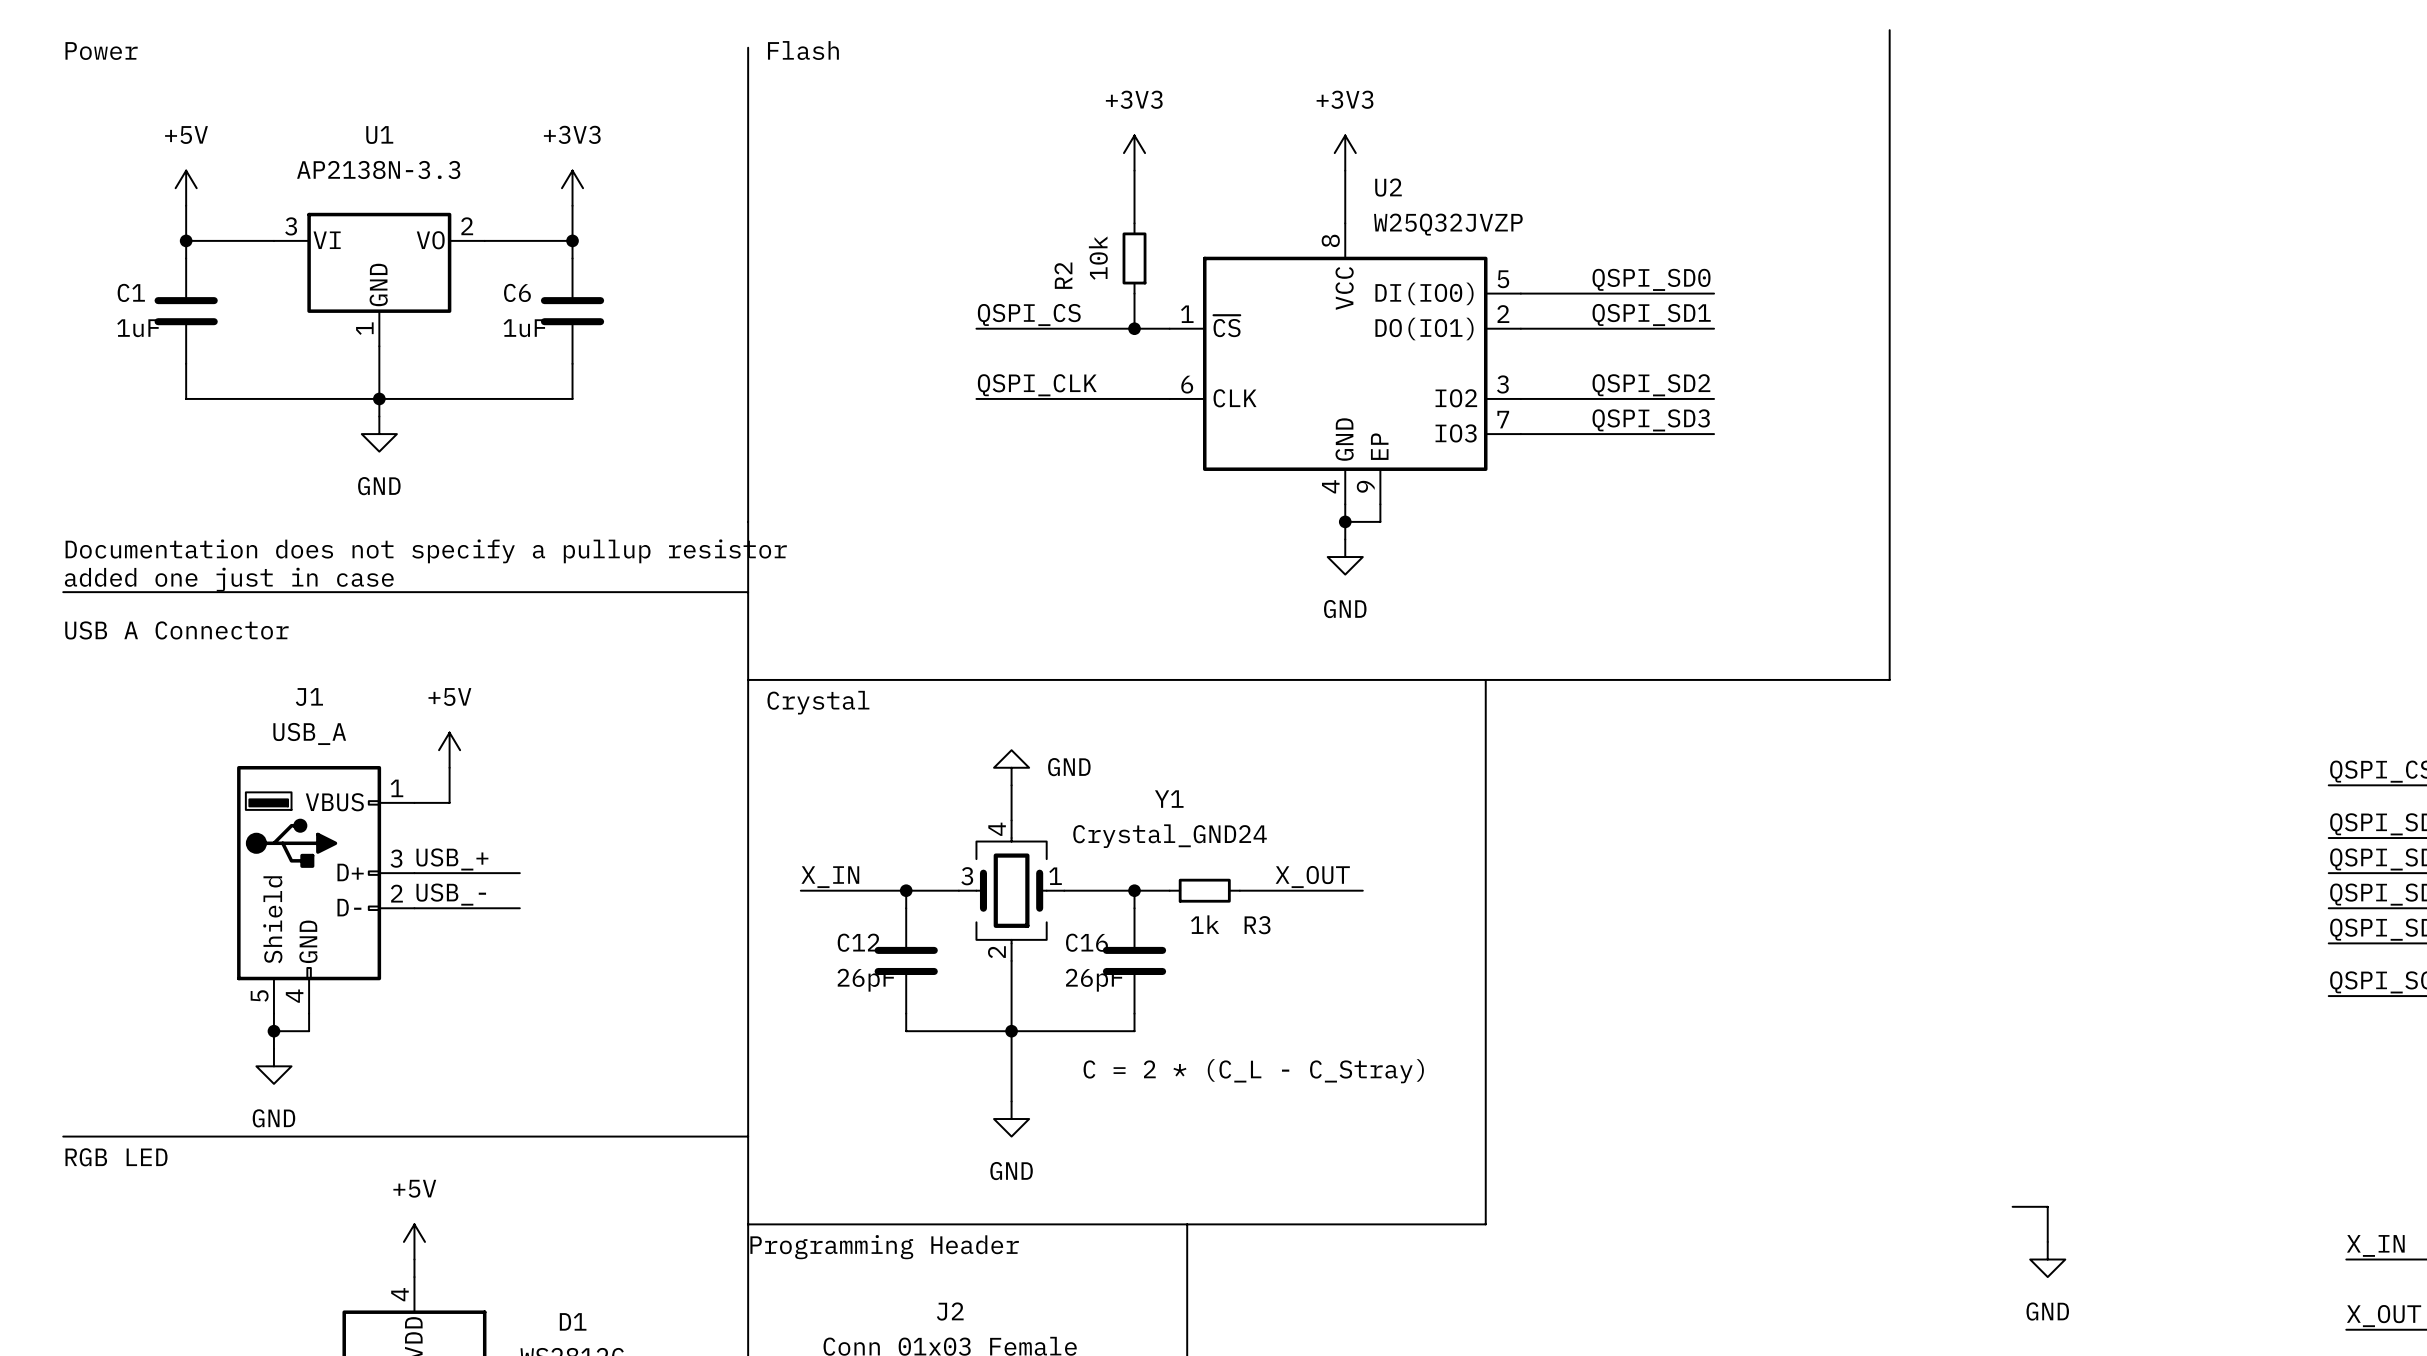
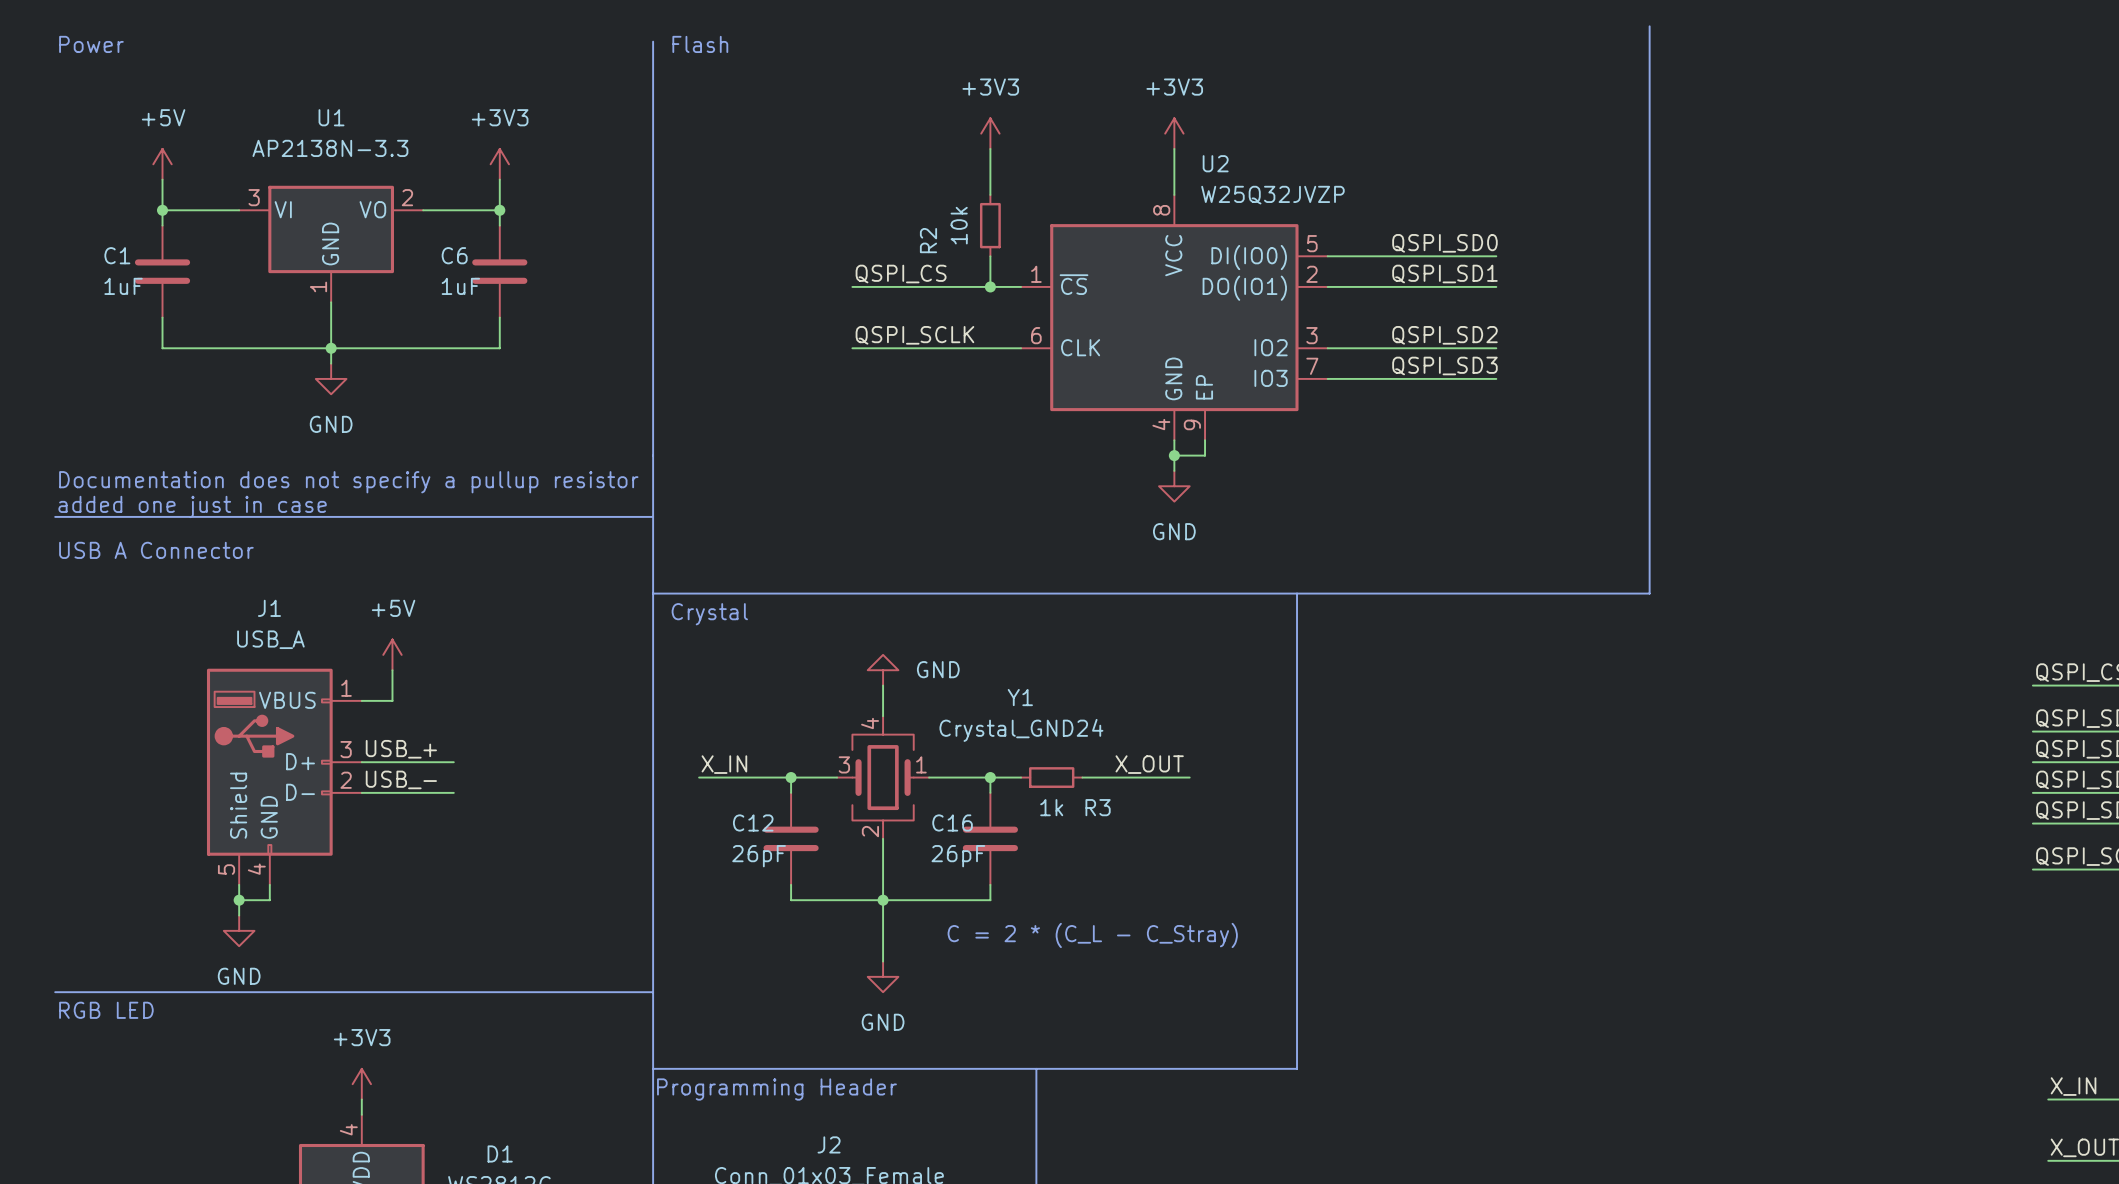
label: QSPI_CLK (1037, 385) -> QSPI_SCLK (914, 335)
wire: (2012, 1206) (2047, 1206) (2047, 1241) -> none
power symbol: +5V (414, 1241) -> +3V3 (361, 1084)
power symbol: GND (2047, 1259) -> none

